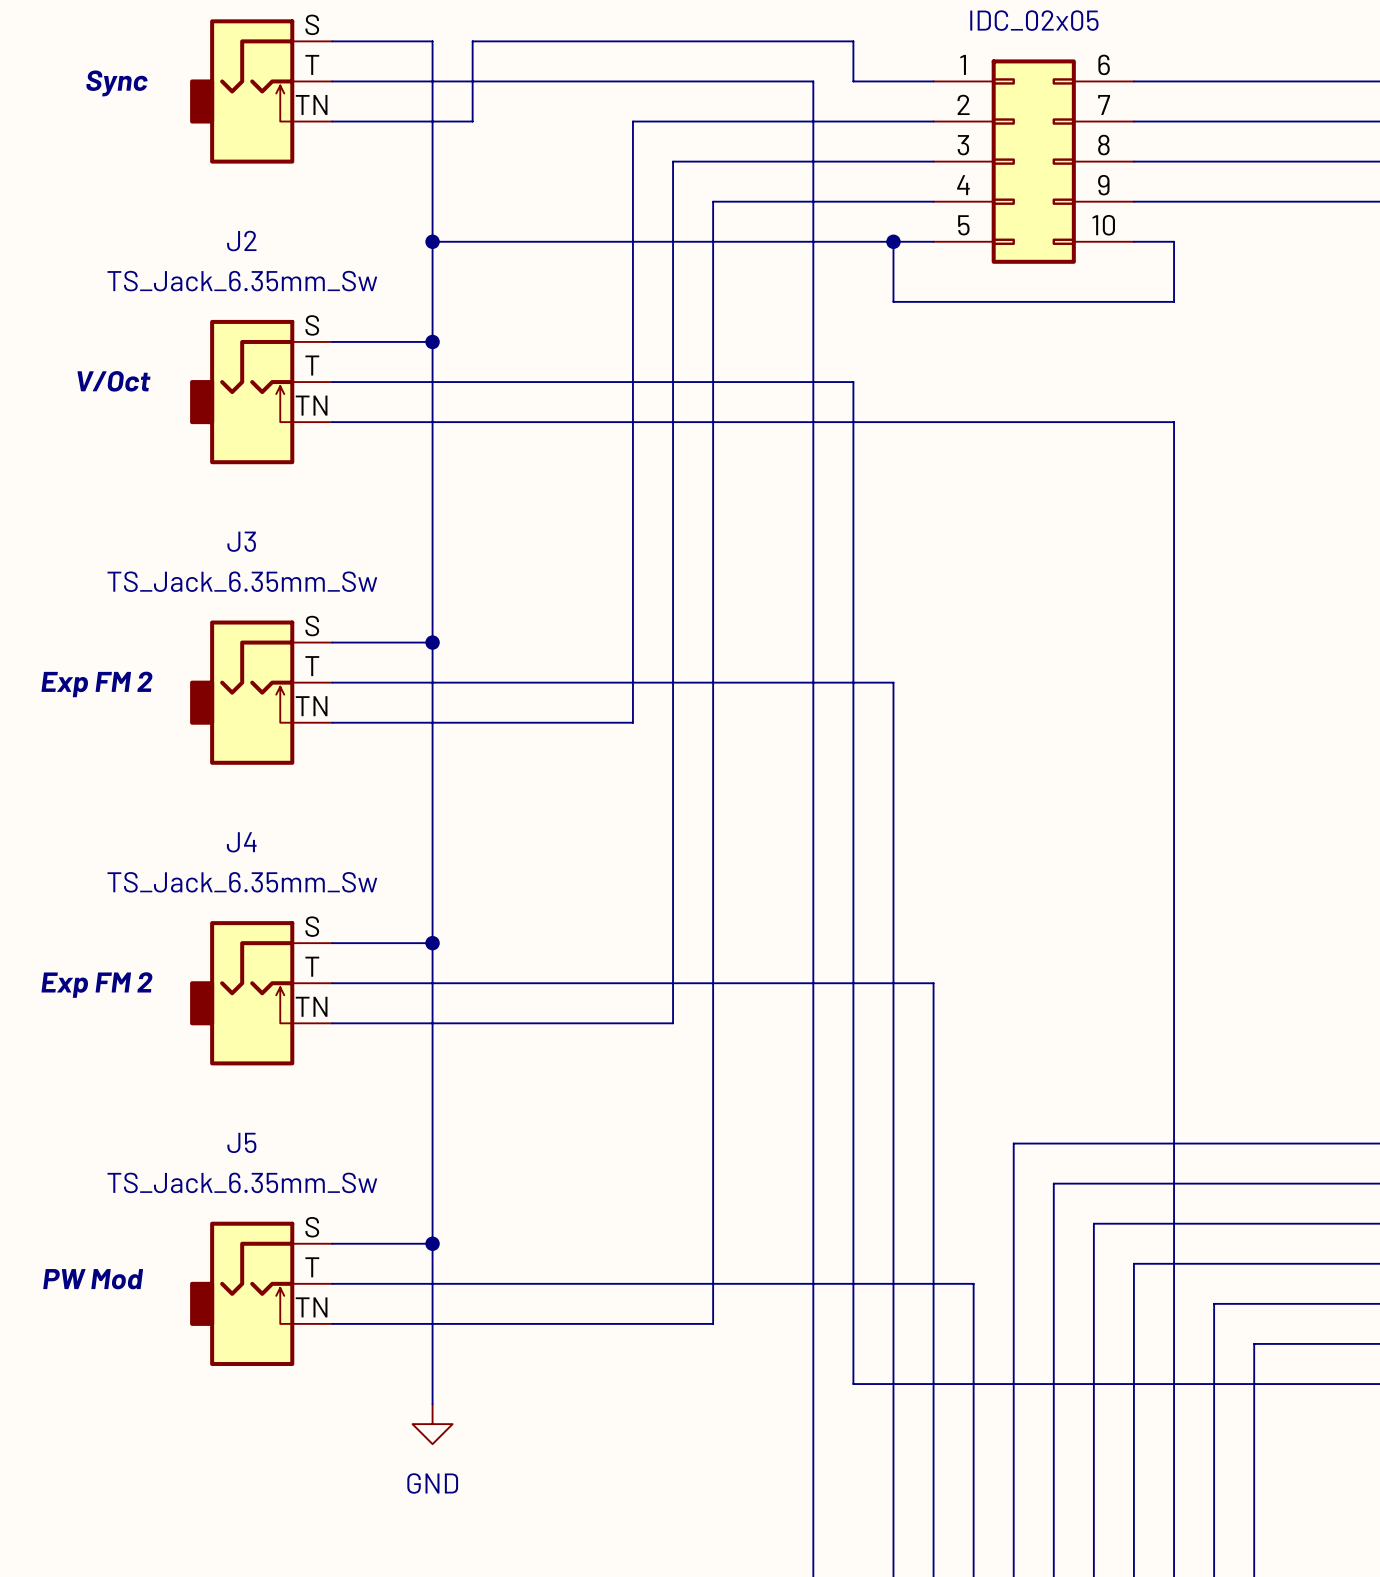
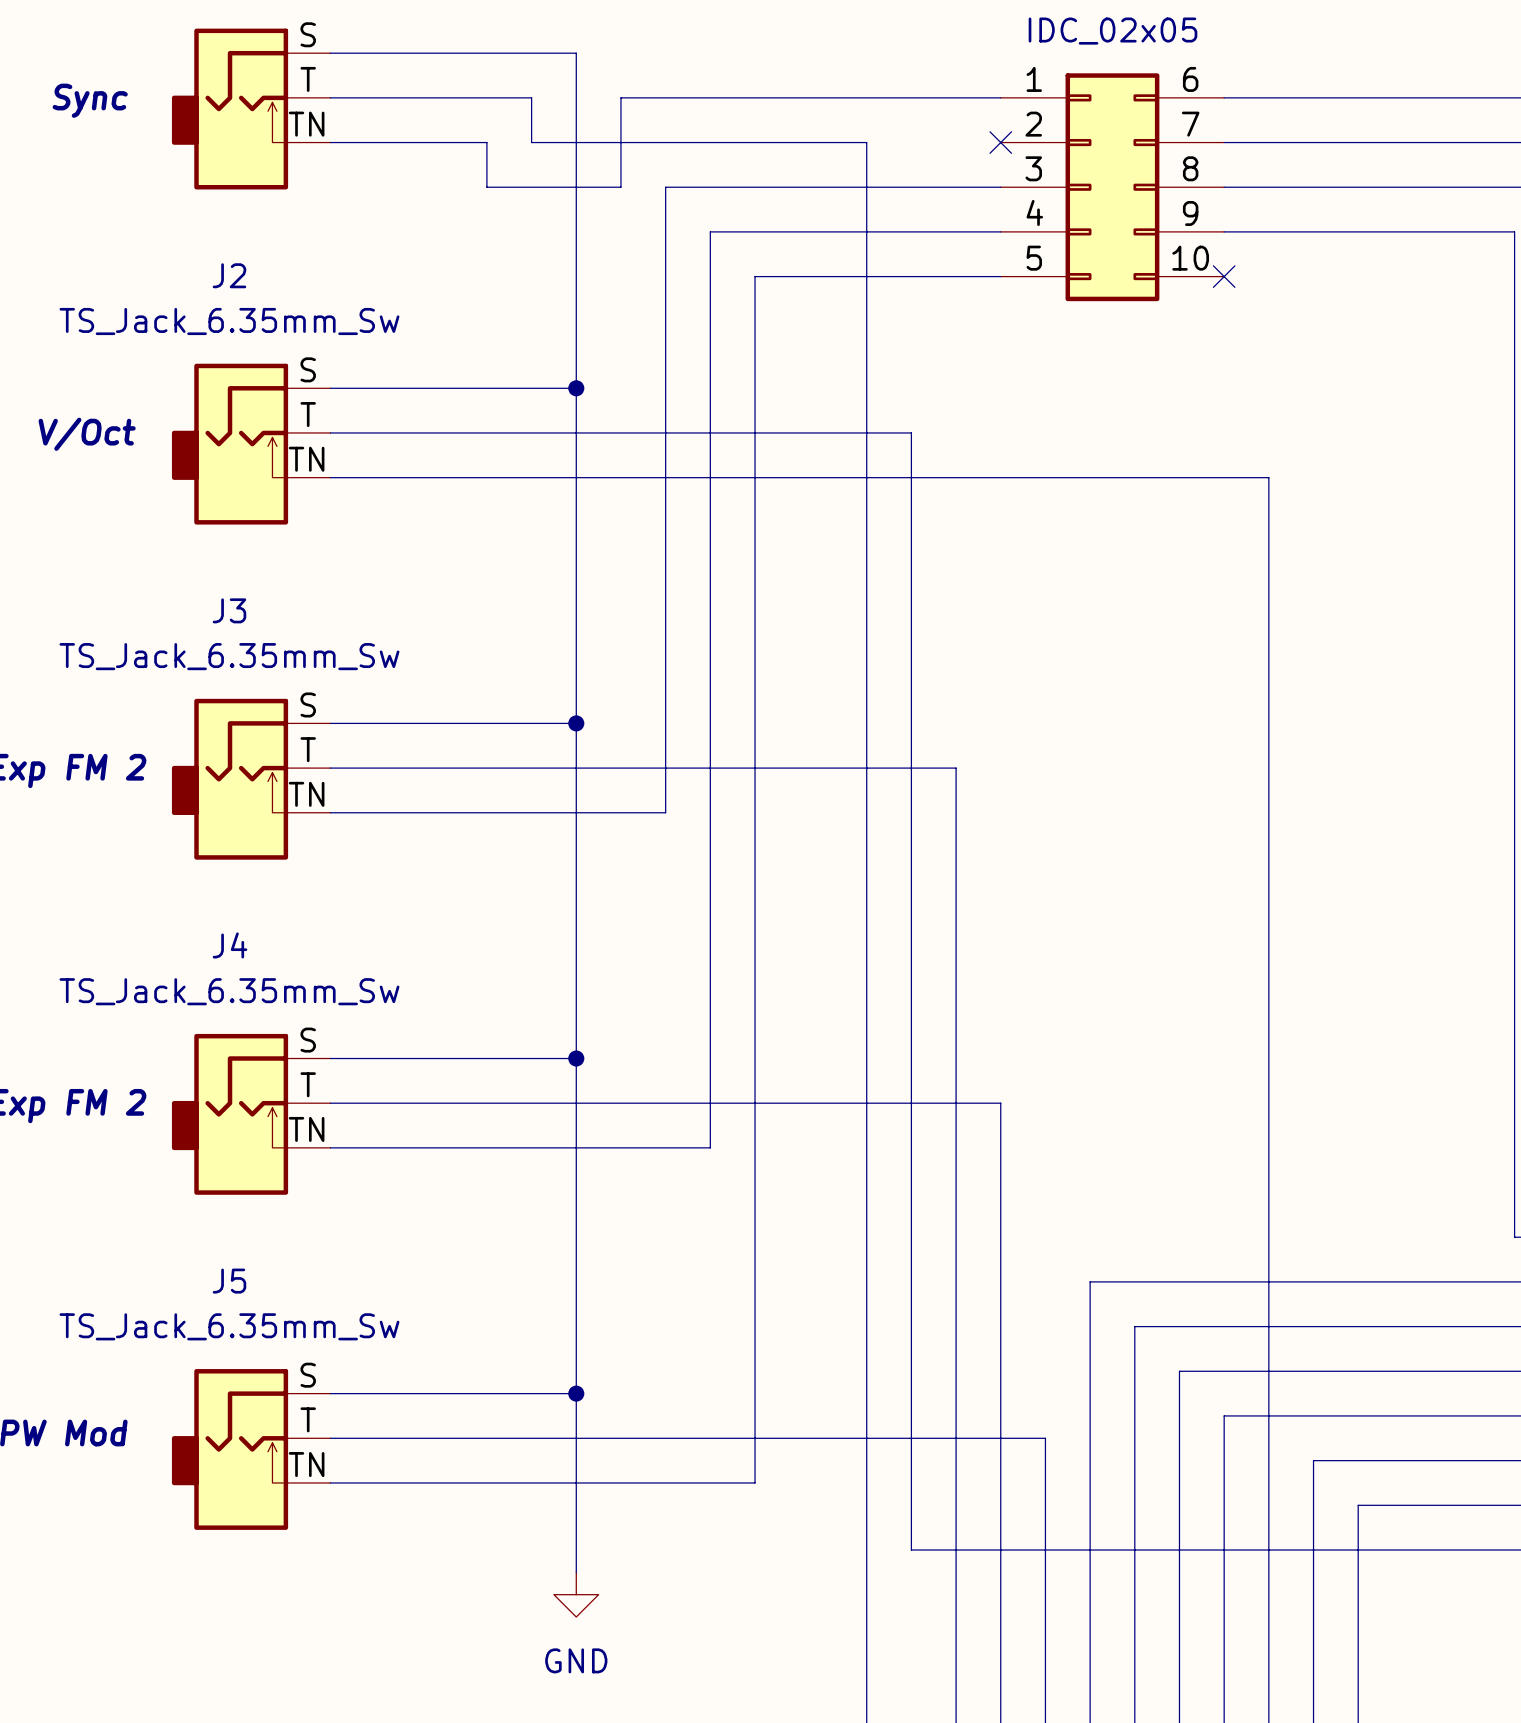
wire: (432, 41) (432, 1404) -> none
wire: (472, 41) (472, 121) -> (486, 53) (442, 53)
wire: (552, 41) (853, 41) (853, 81) -> (576, 53) (576, 1572)
wire: (512, 81) (592, 81) -> (531, 97) (531, 142) (665, 142)
wire: none -> (620, 97) (620, 187) (486, 187) (486, 142)
wire: (813, 81) (813, 121) (933, 121) -> (866, 97) (911, 97)
wire: (632, 121) (632, 161) -> (710, 187) (665, 187)
no-connect mark: none -> (1000, 142)
wire: (673, 161) (673, 201) -> (755, 231) (710, 231)
wire: (713, 201) (713, 241) (432, 241) -> none
junction: (432, 241) -> none
wire: (893, 241) (893, 301) (1174, 301) (1174, 241) (1133, 241) -> none
junction: (893, 241) -> none
no-connect mark: none -> (1224, 276)
wire: none -> (442, 388) (576, 388)
junction: (432, 341) -> none
junction: none -> (576, 388)
wire: none -> (442, 723) (576, 723)
junction: (432, 642) -> none
junction: none -> (576, 723)
wire: none -> (442, 1058) (576, 1058)
junction: (432, 943) -> none
junction: none -> (576, 1058)
wire: none -> (442, 1393) (576, 1393)
junction: (432, 1243) -> none
junction: none -> (576, 1393)
power symbol position: GND (432, 1424) -> GND (576, 1594)

